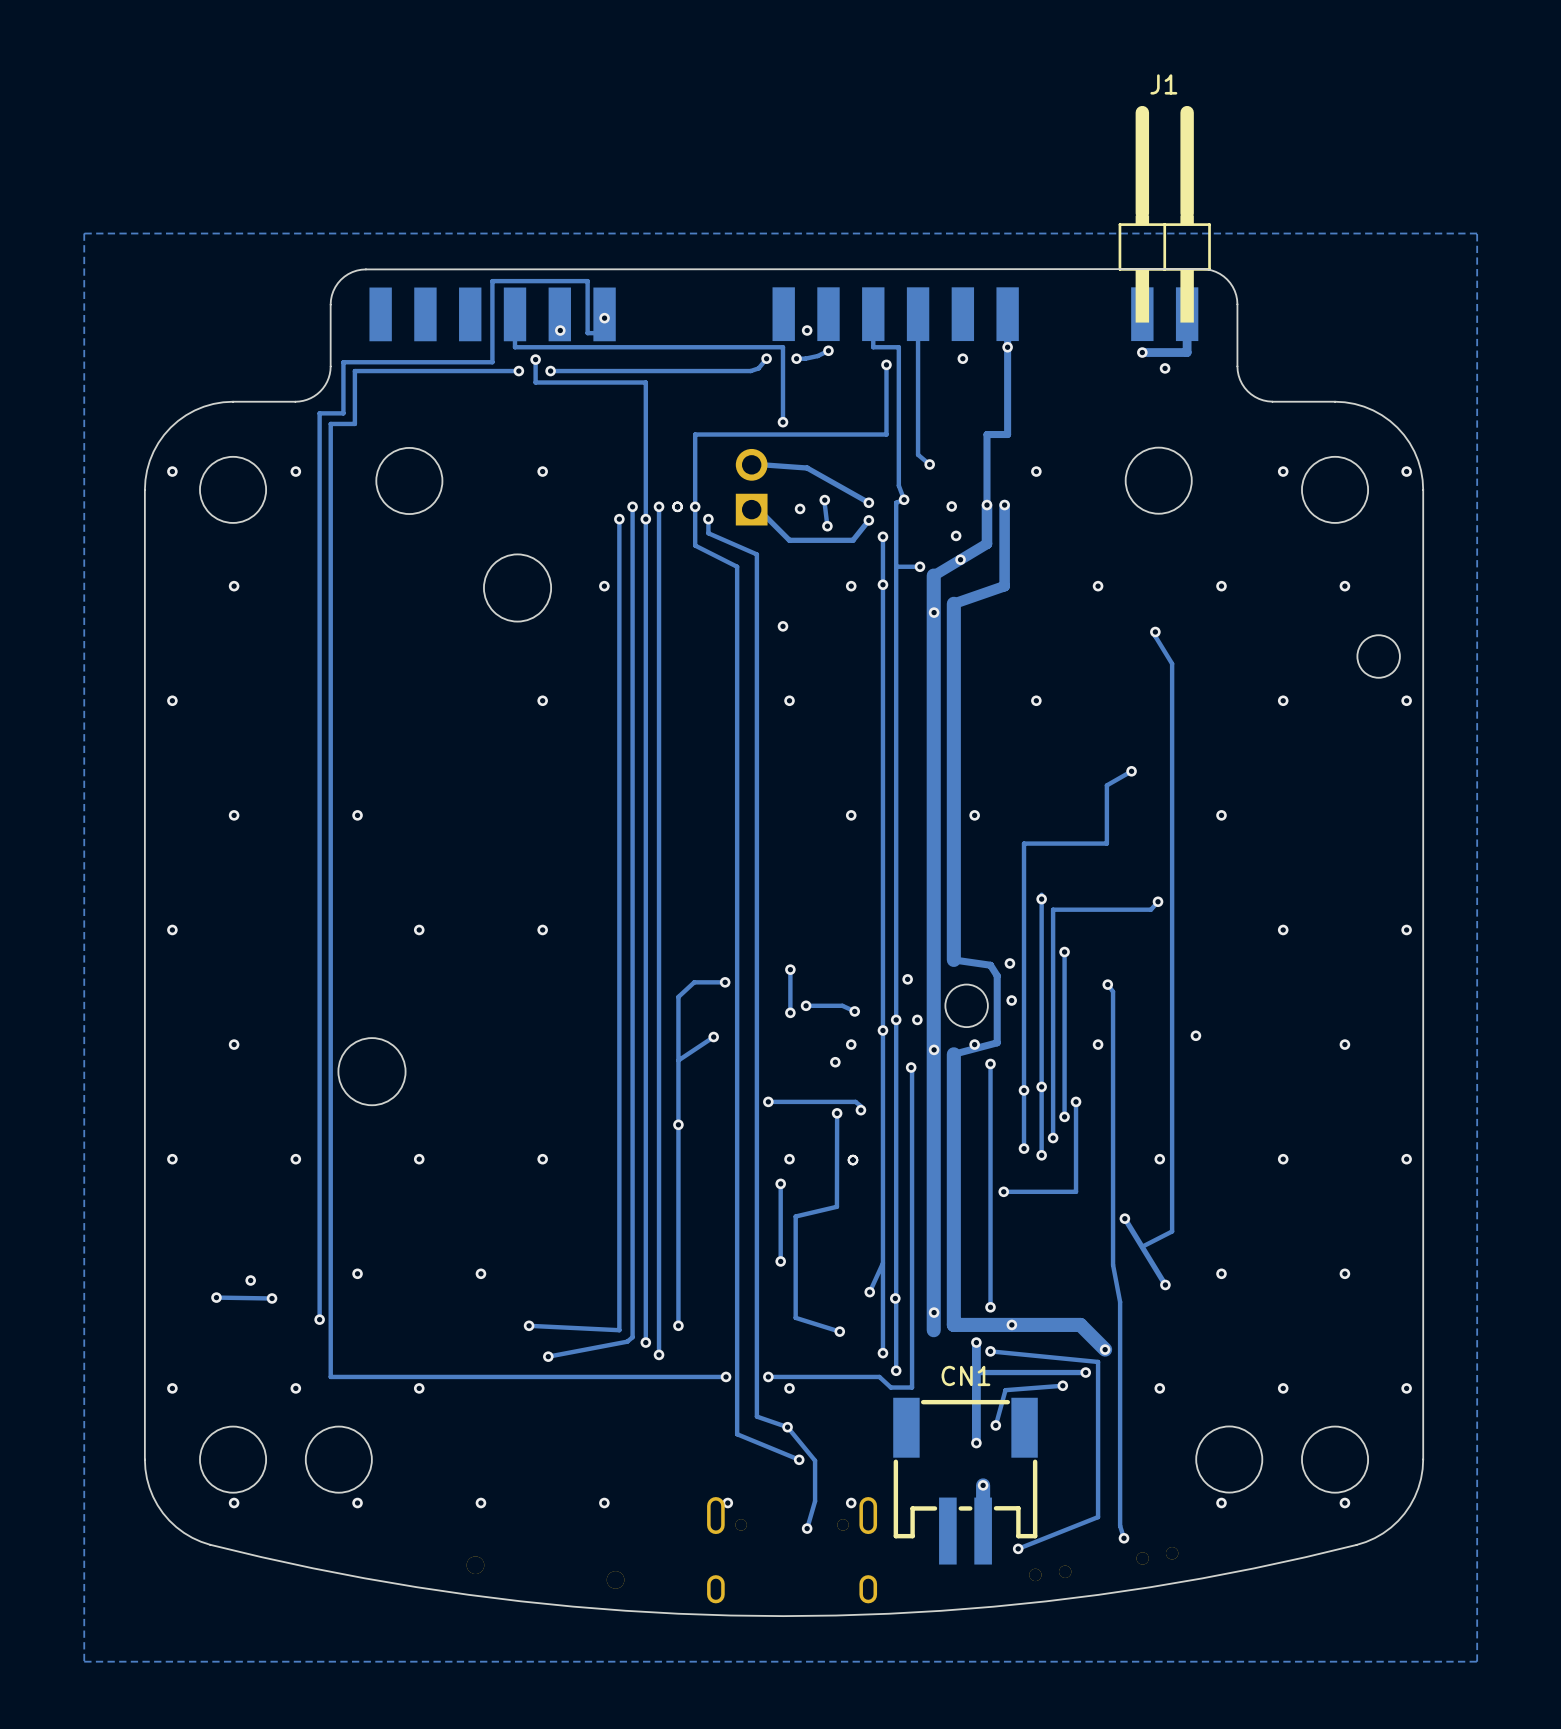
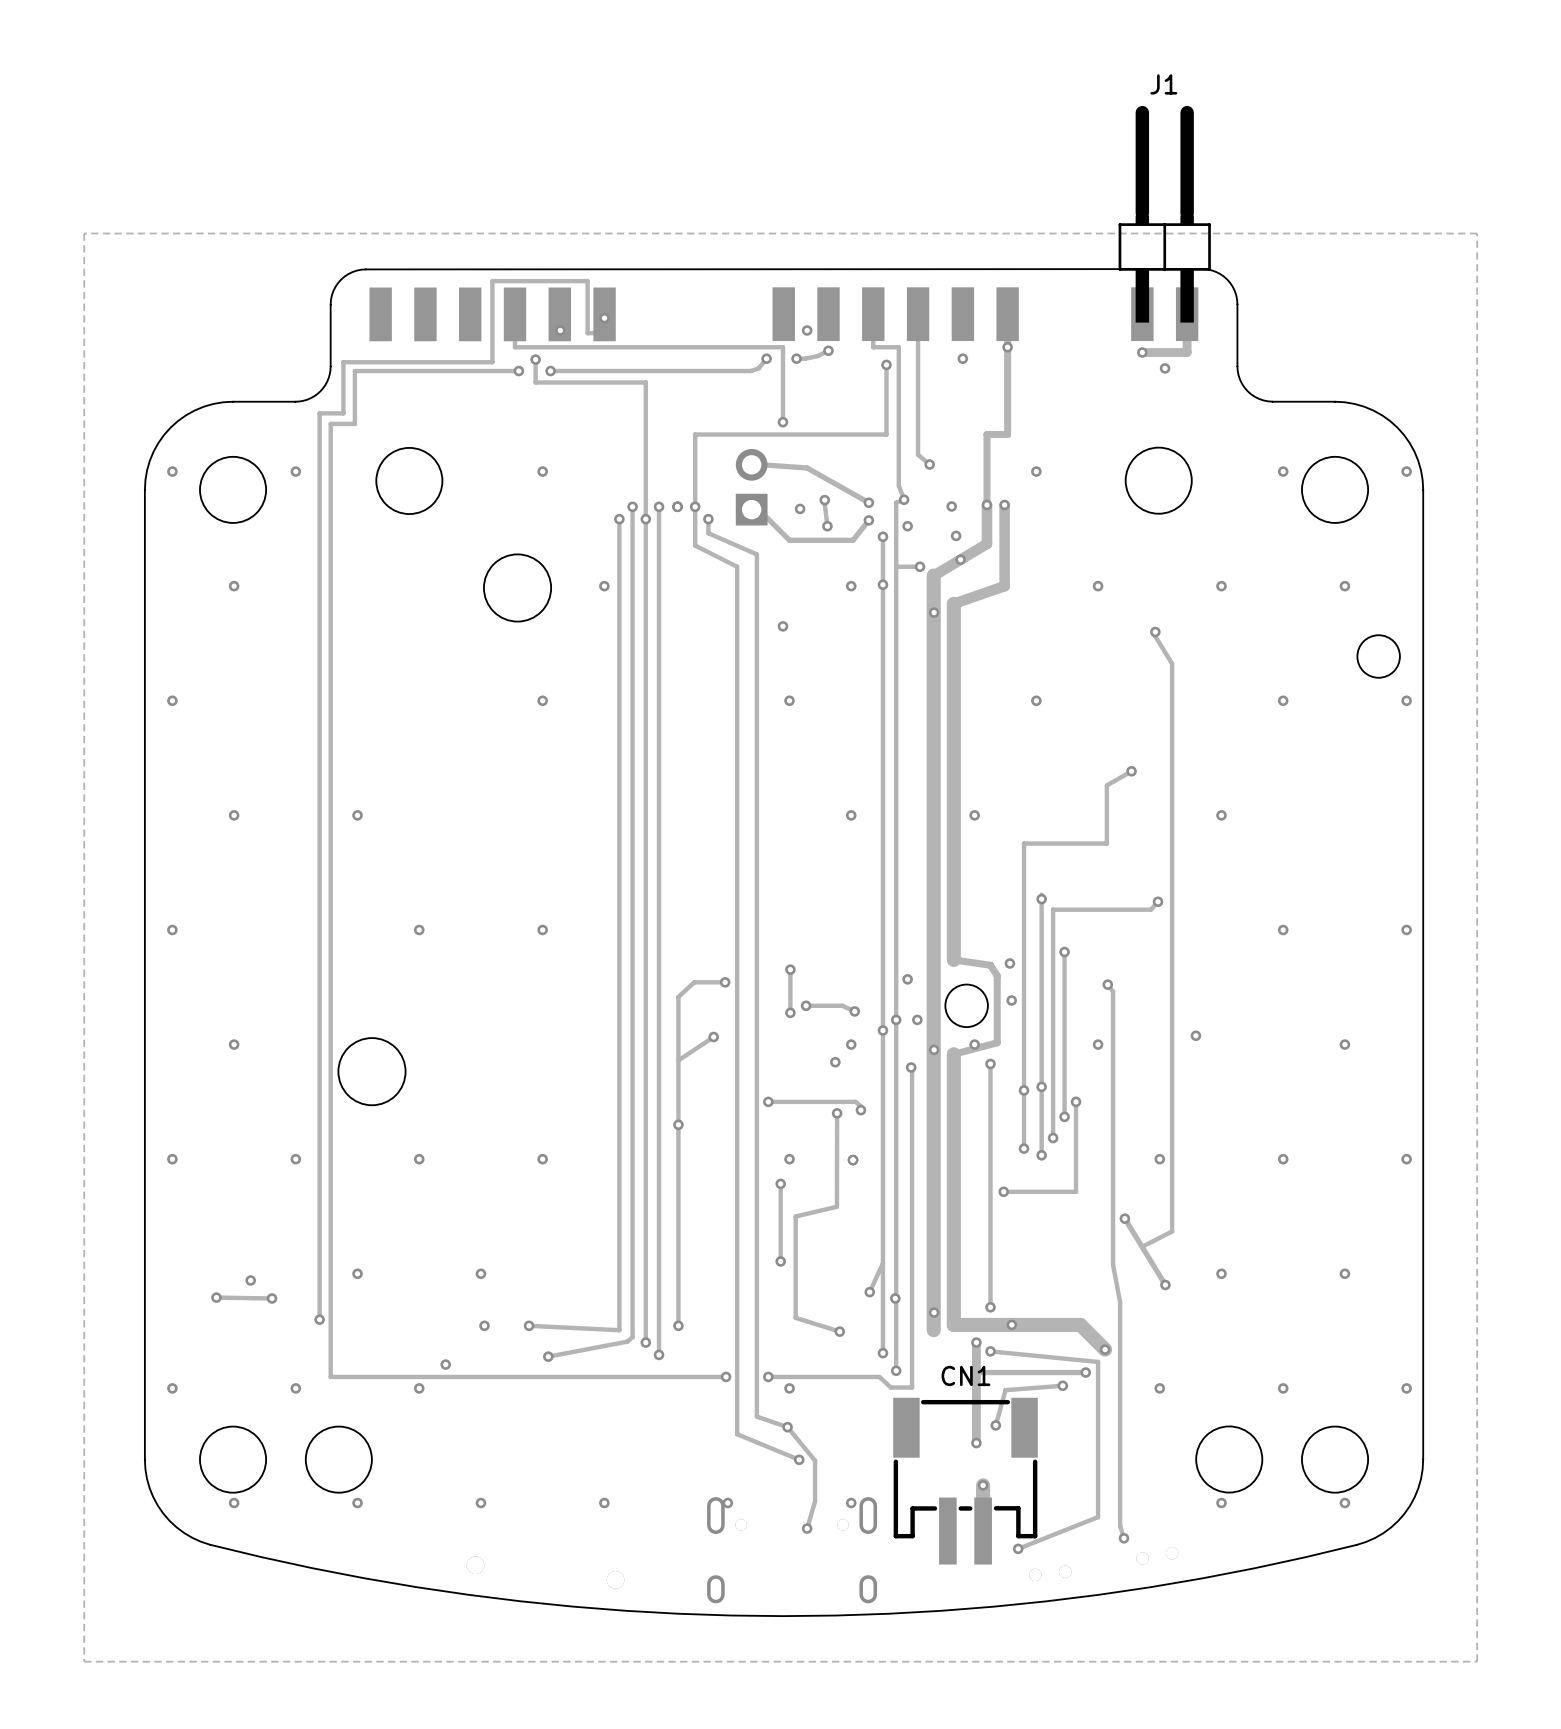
via: none -> (907, 526)
via: none -> (484, 1325)
via: none -> (445, 1364)

